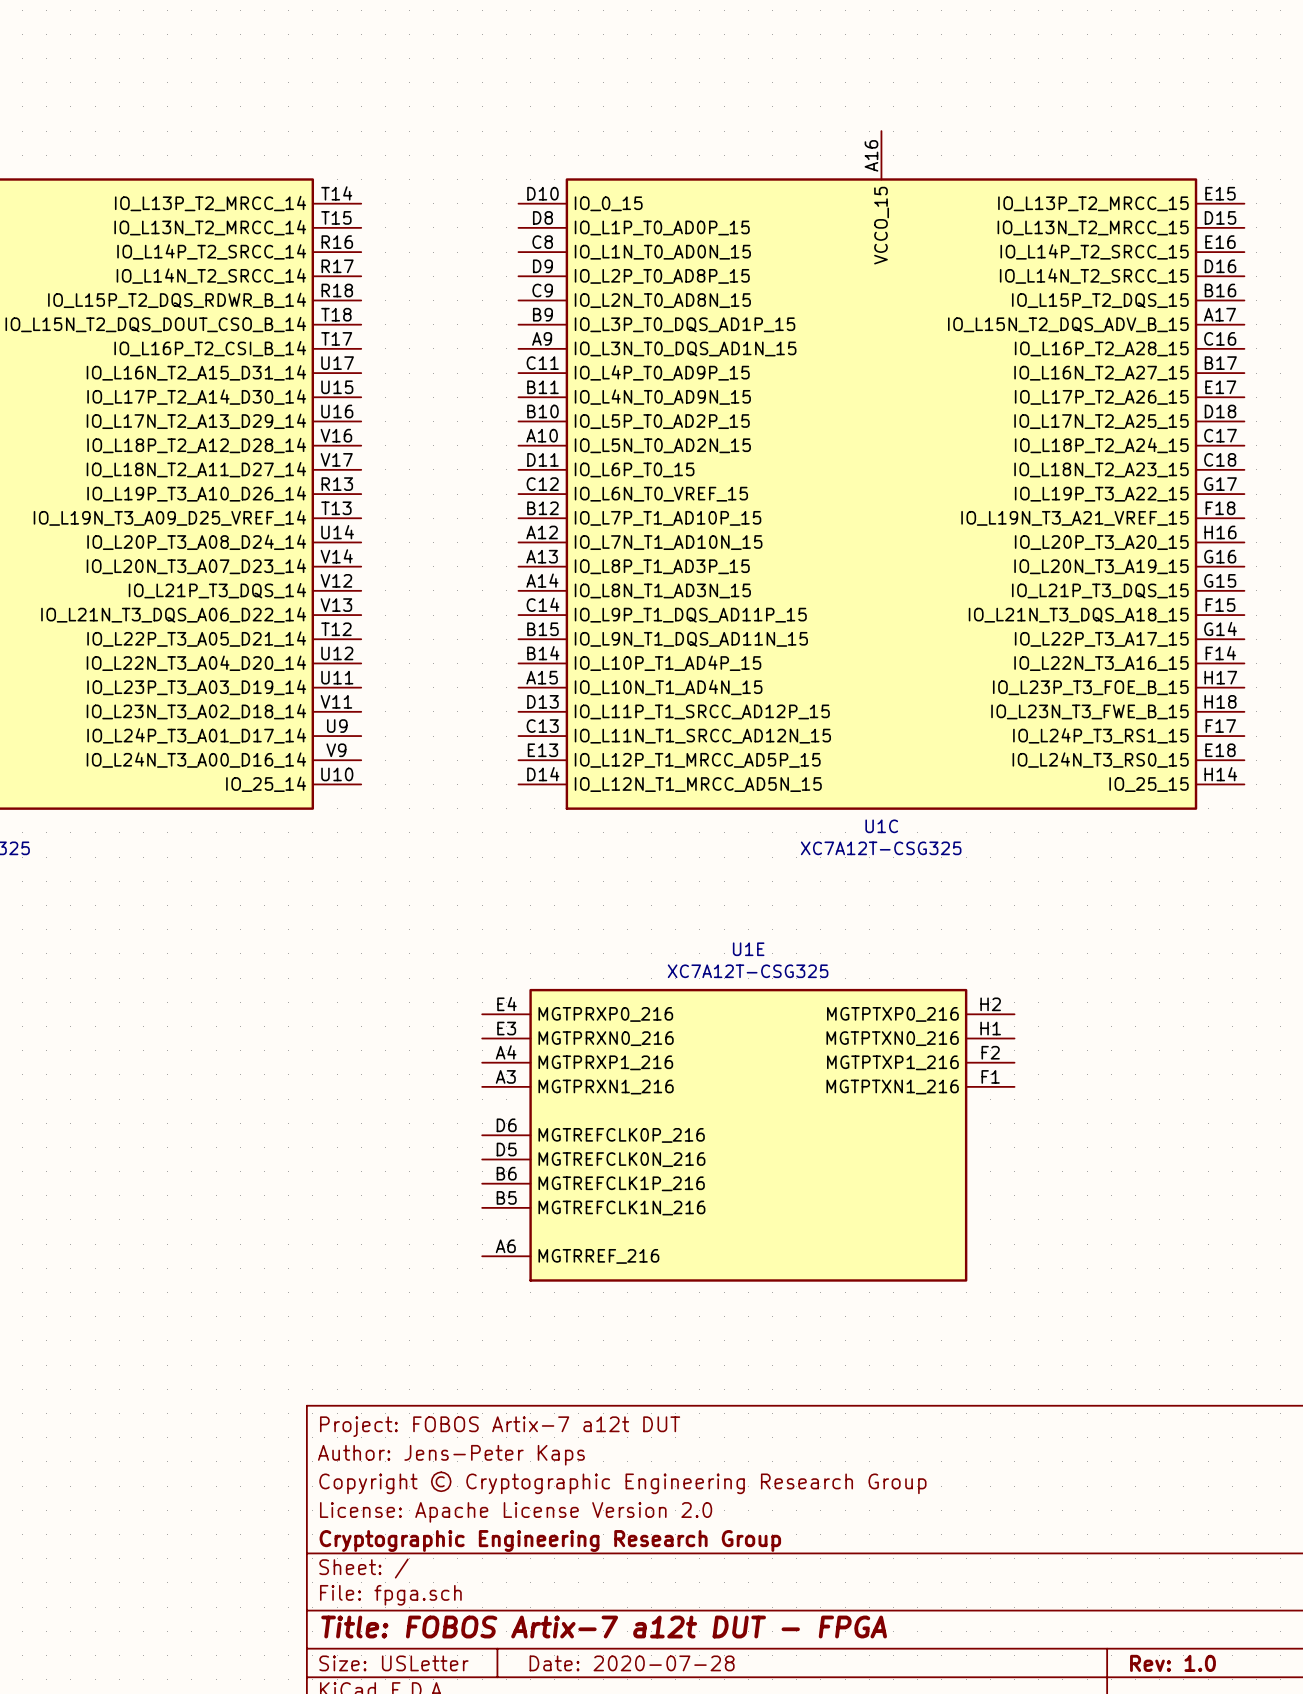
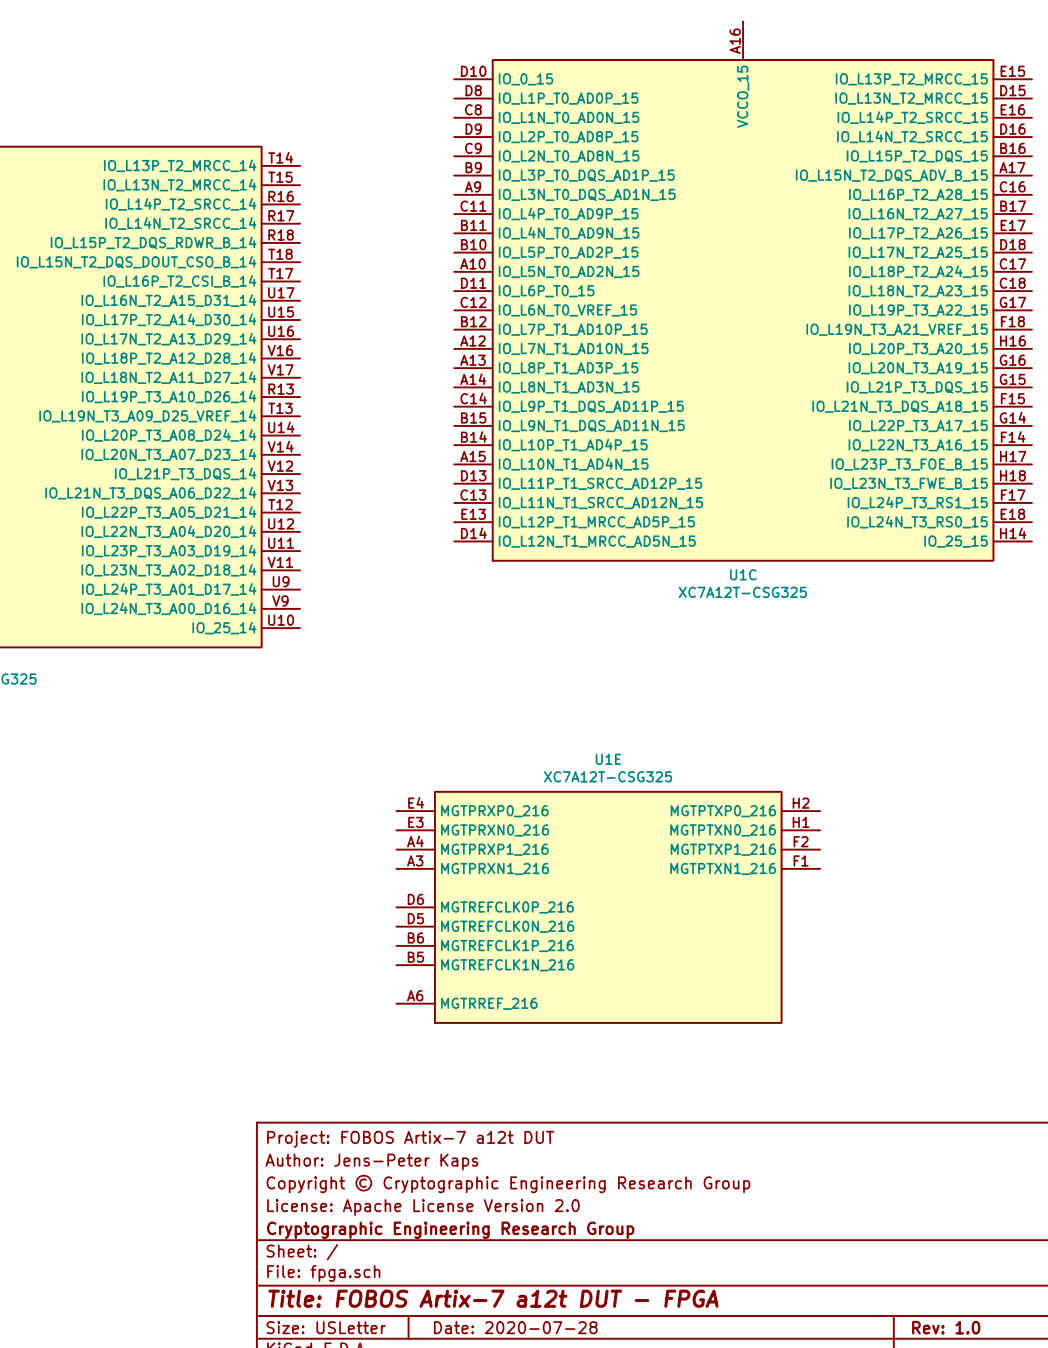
U1C position: (881, 470) -> (743, 291)

